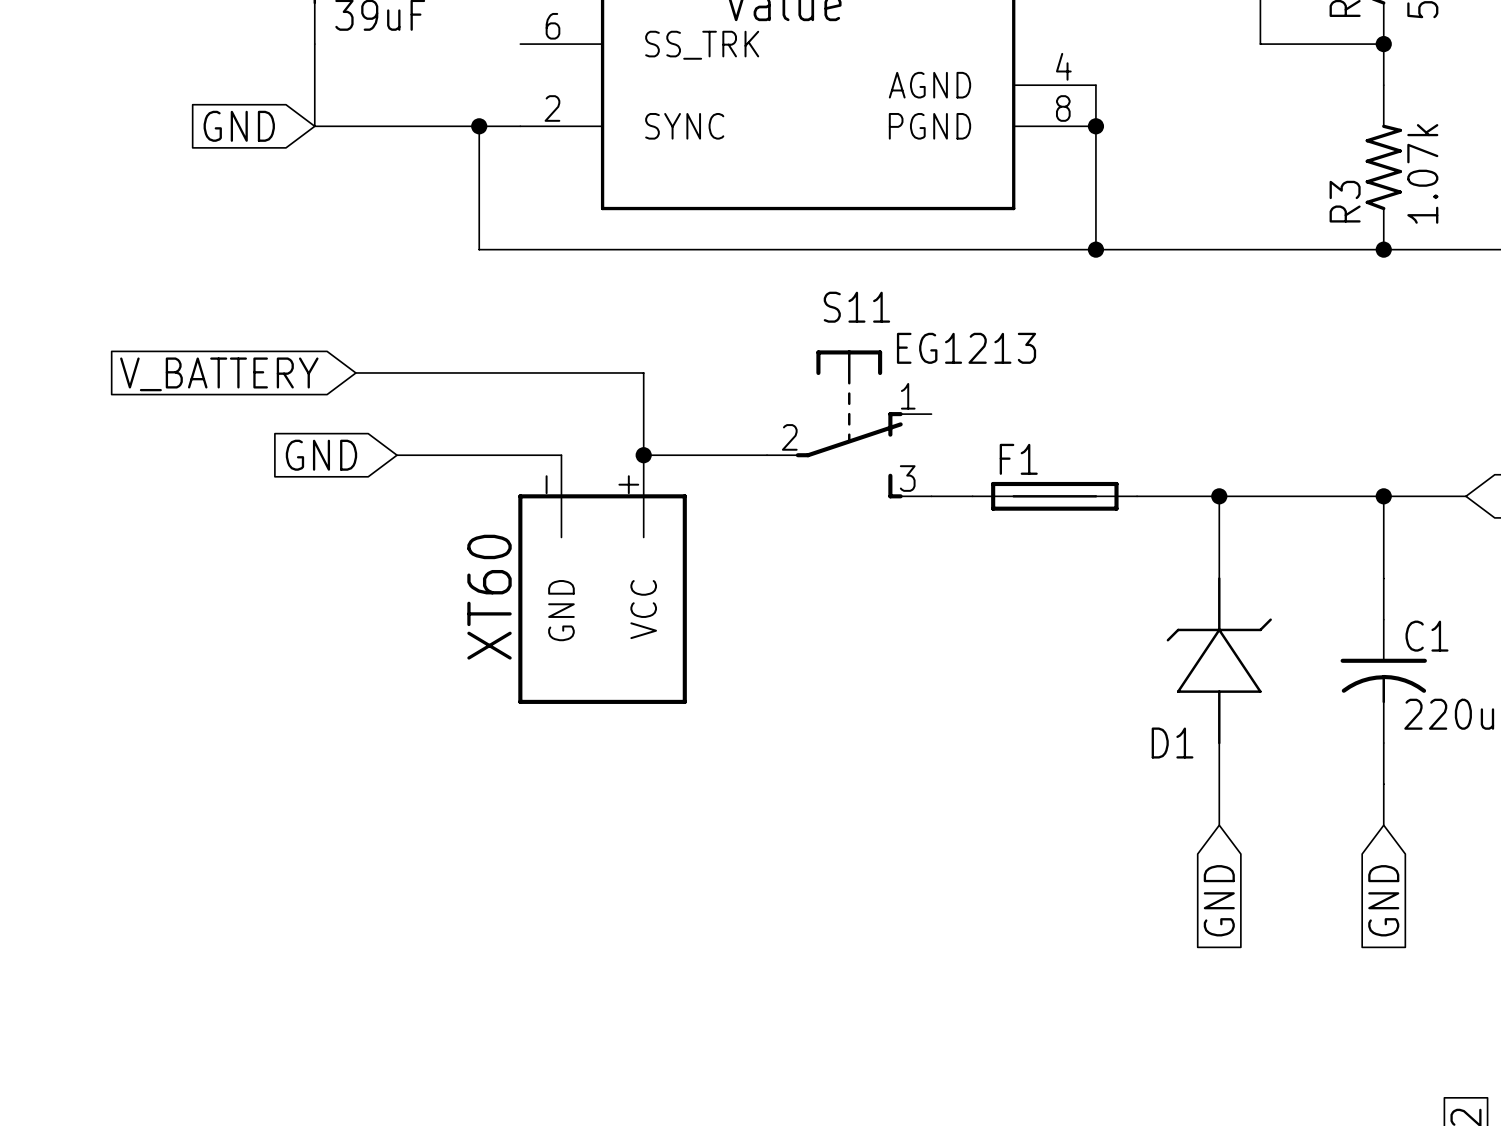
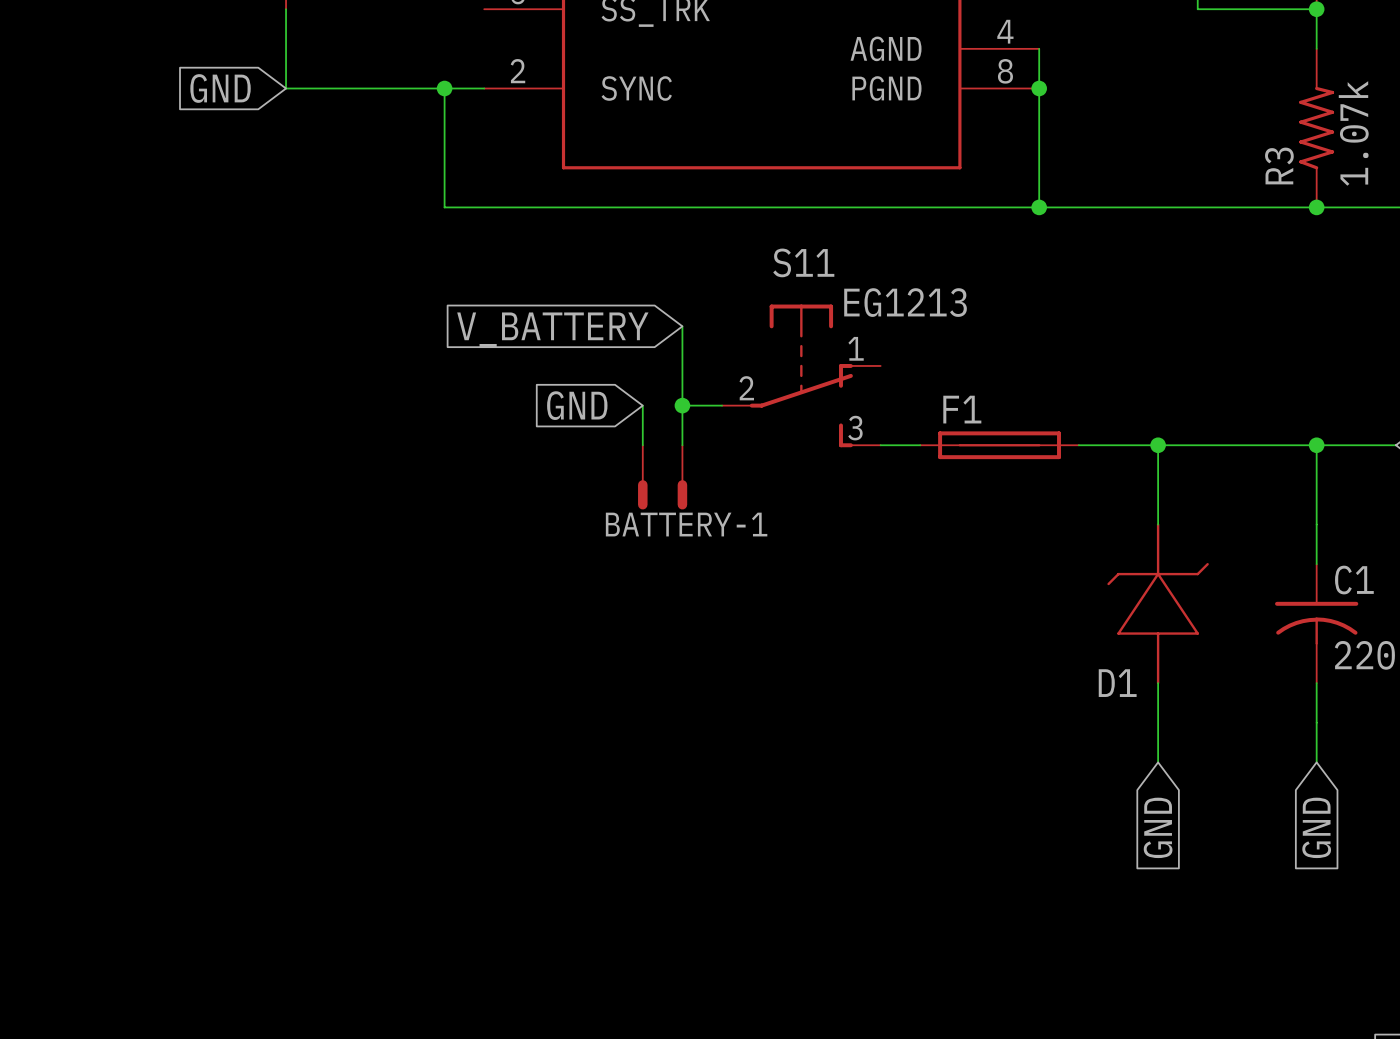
wire: (355, 372) (643, 372) (643, 455) (725, 455) -> none
wire: none -> (682, 326) (682, 445)
global label position: V_BATTERY (219, 374) -> V_BATTERY (552, 329)
global label position: GND (321, 455) -> GND (577, 405)
wire: (397, 455) (561, 455) -> none
junction position: (643, 455) -> (682, 405)
wire: none -> (642, 405) (642, 445)
part: none -> (642, 477)
BATTERY-1: none -> (682, 477)
part: (602, 579) -> none

